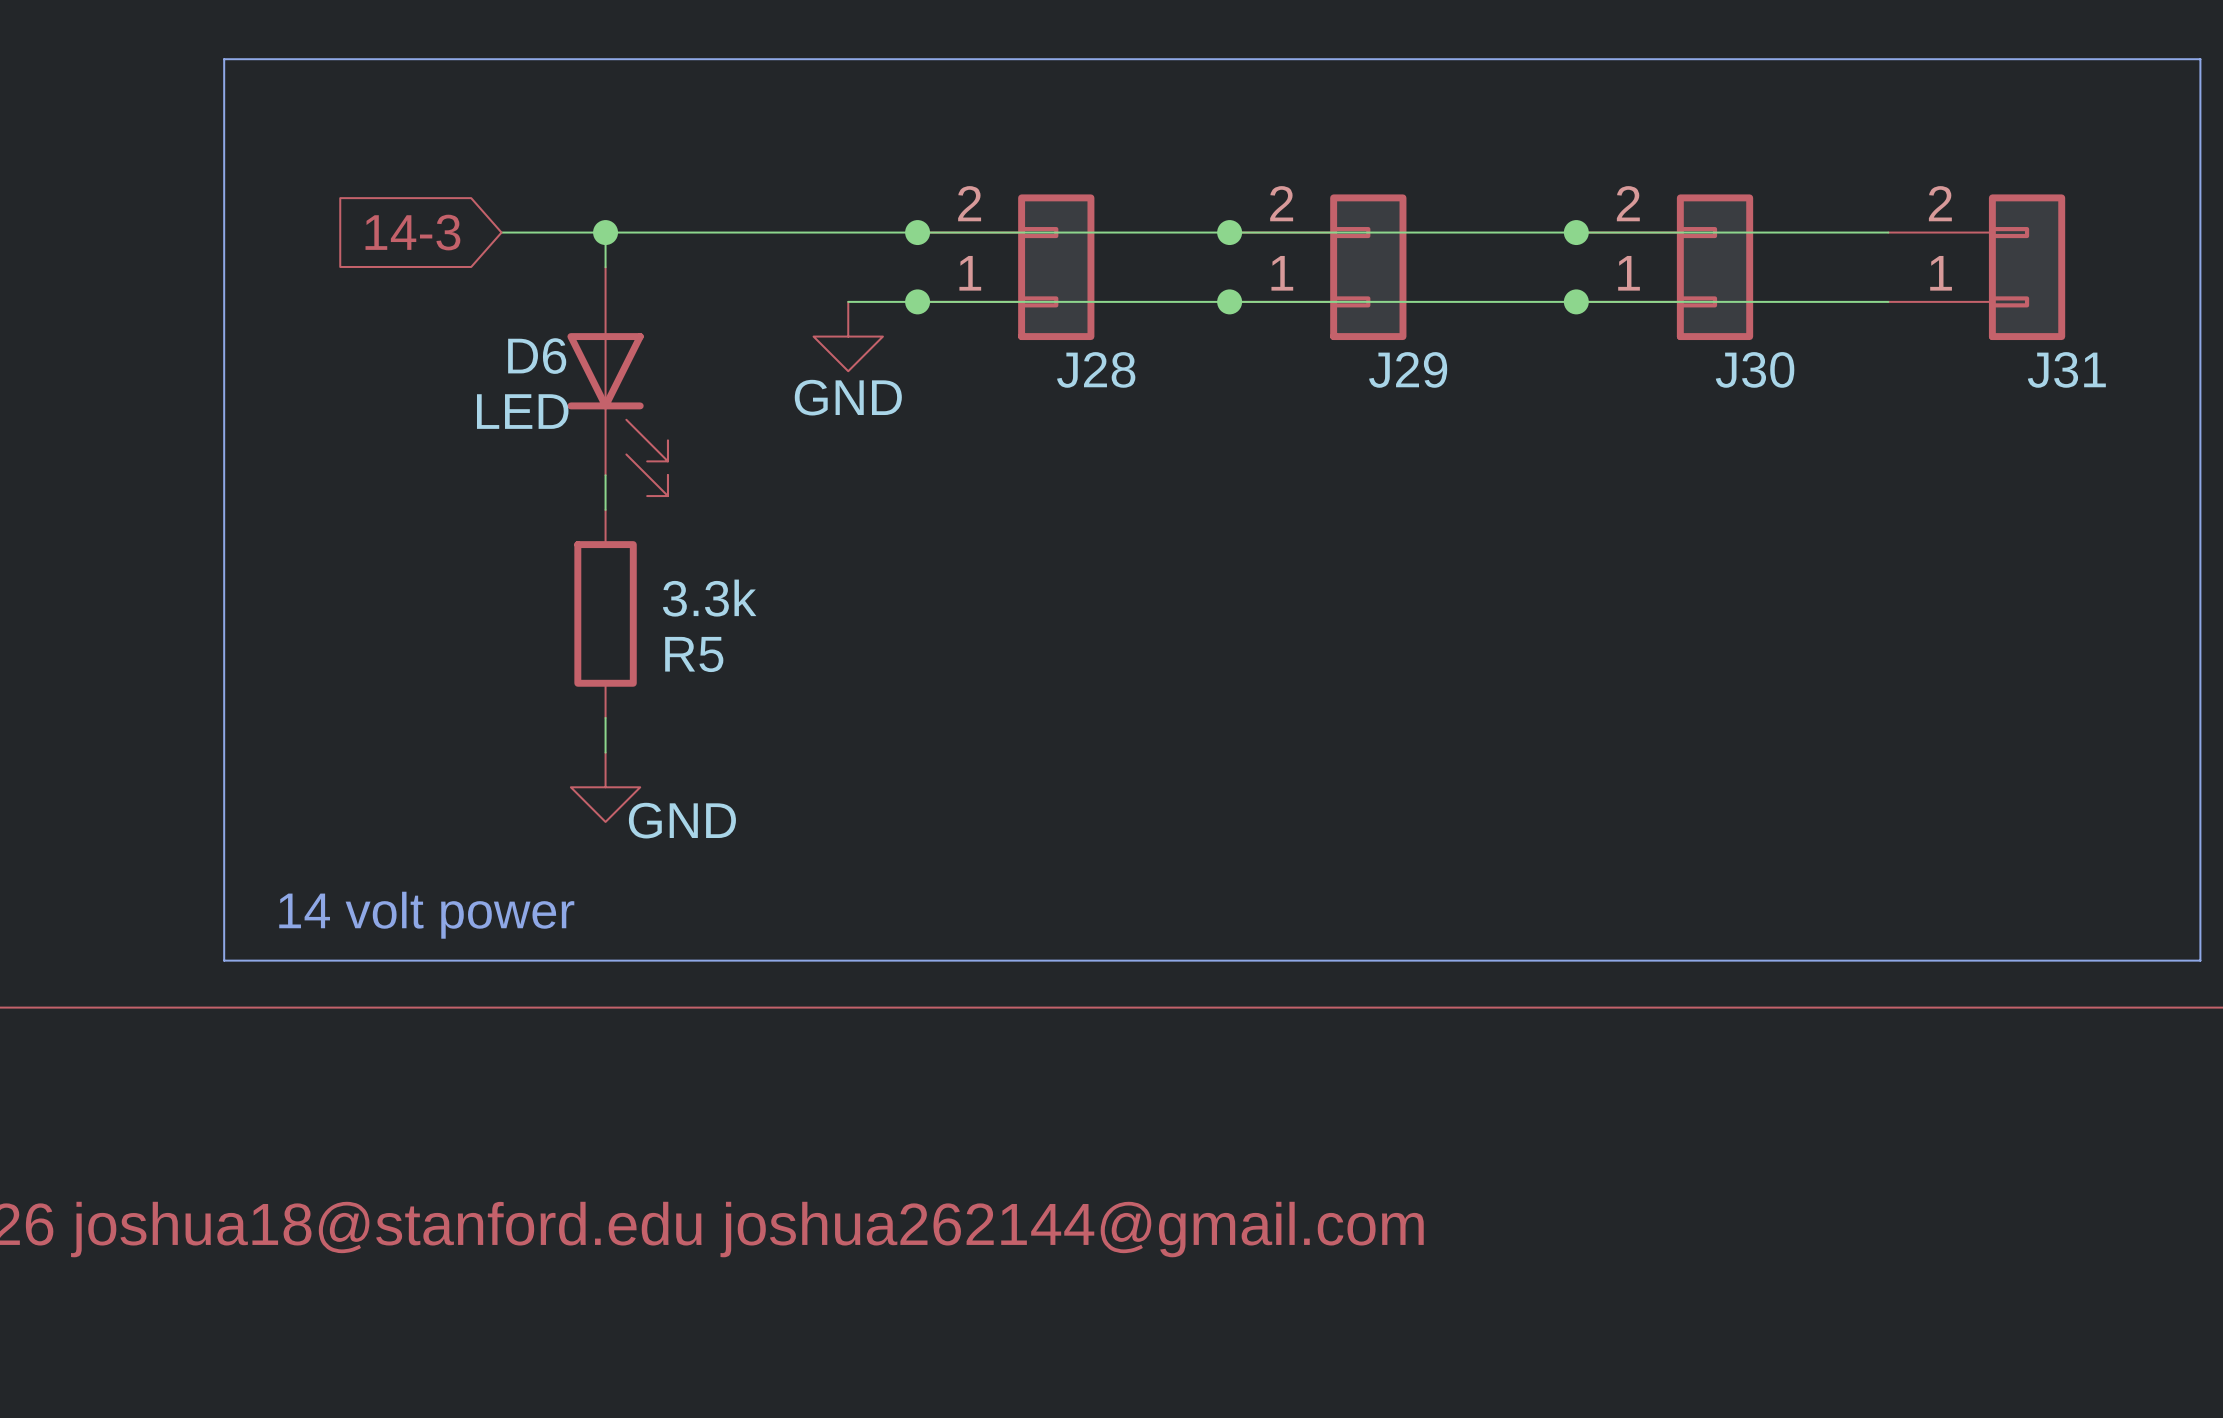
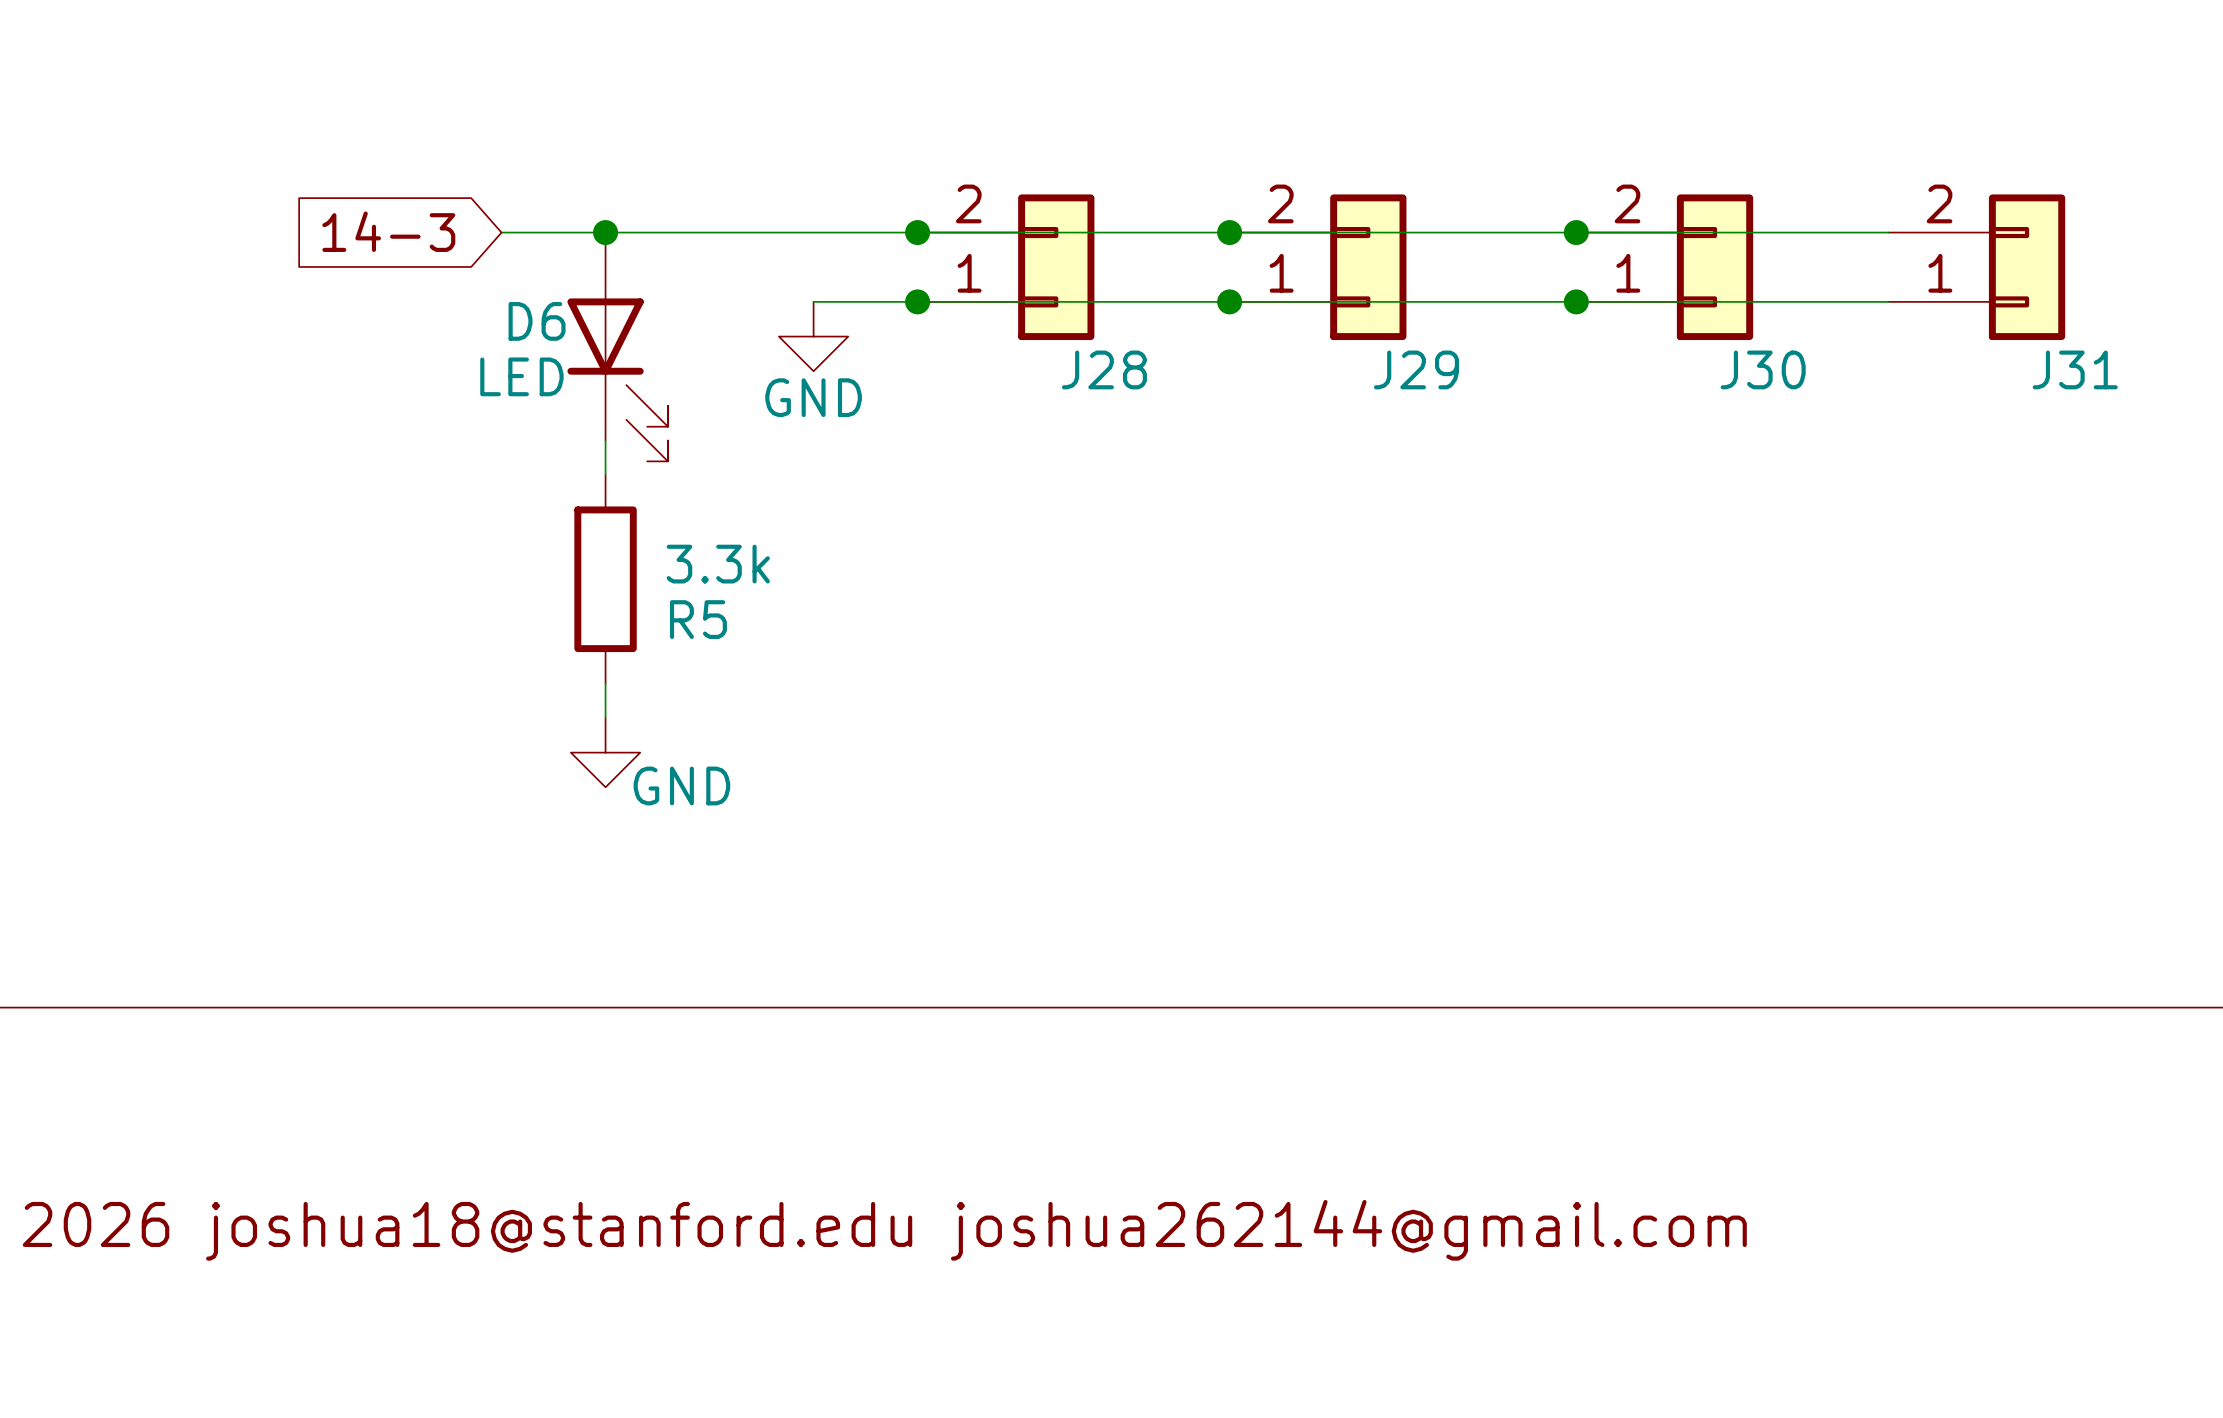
line: (224, 59) (2200, 59) (2200, 960) (224, 960) (224, 59) -> none
wire: none -> (813, 301) (848, 301)
power symbol position: GND (848, 336) -> GND (813, 336)
D6 position: (617, 381) -> (617, 346)
R5 position: (605, 613) -> (605, 579)
power symbol position: GND (605, 787) -> GND (605, 752)
text: 14 volt power (426, 915) -> none

